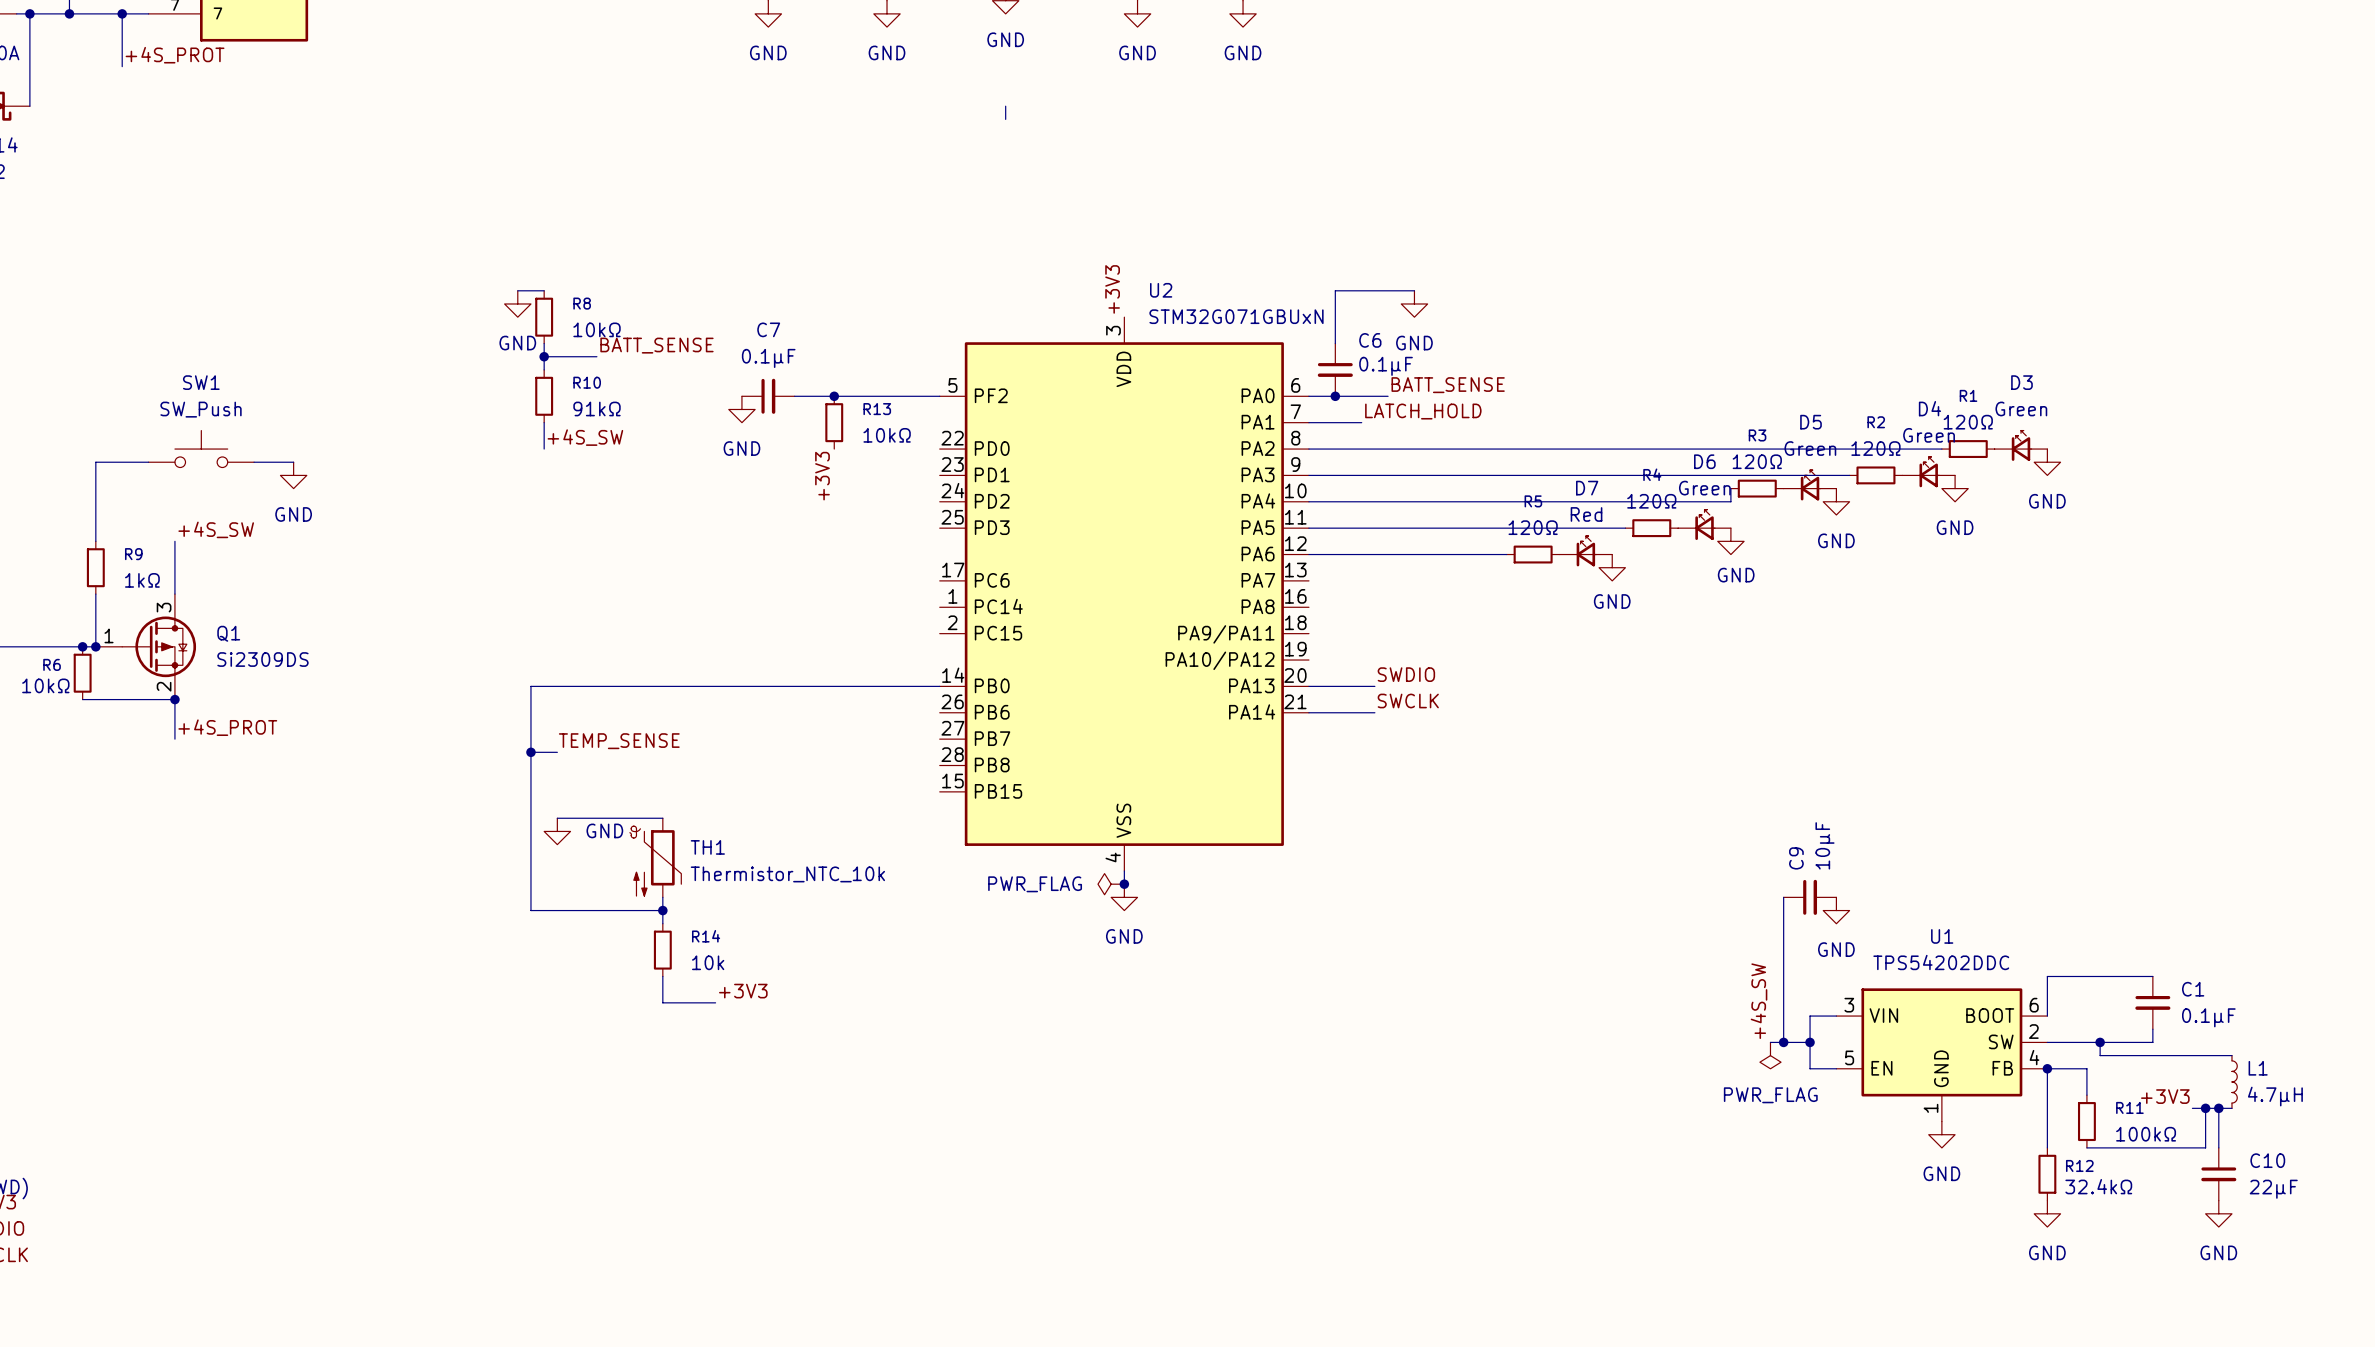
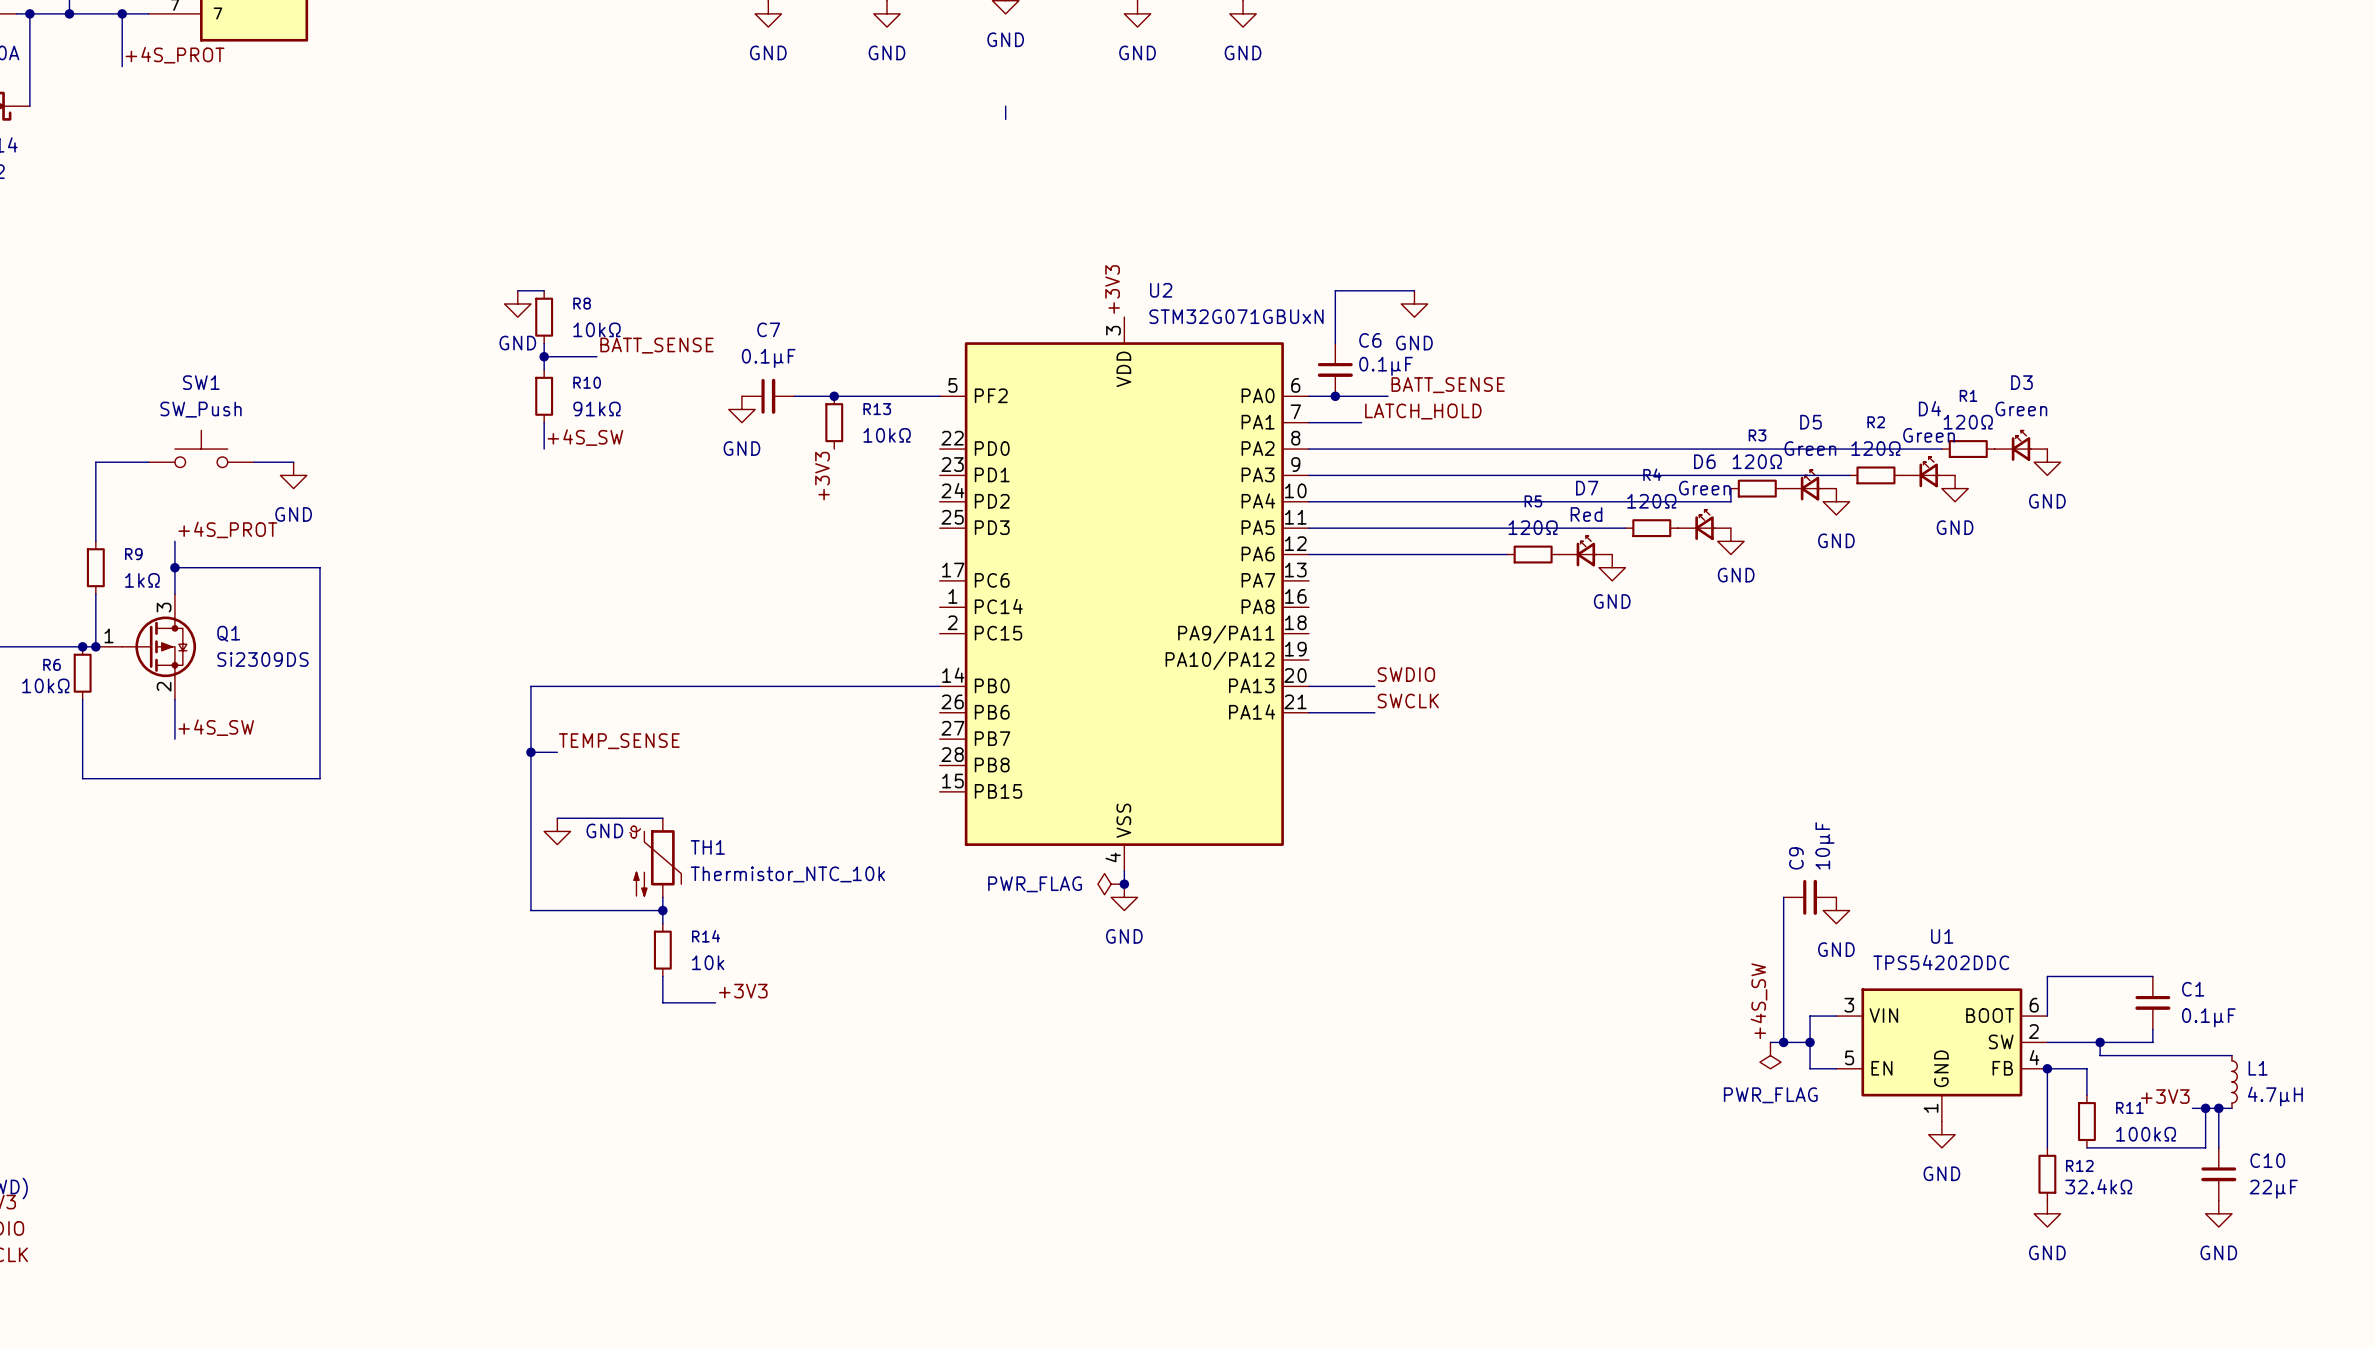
label: +4S_SW (216, 529) -> +4S_PROT (227, 529)
junction: none -> (174, 567)
wire: (82, 699) (174, 699) -> (82, 699) (82, 778) (320, 778) (320, 567) (174, 567)
junction: (174, 699) -> none
label: +4S_PROT (227, 727) -> +4S_SW (216, 727)

